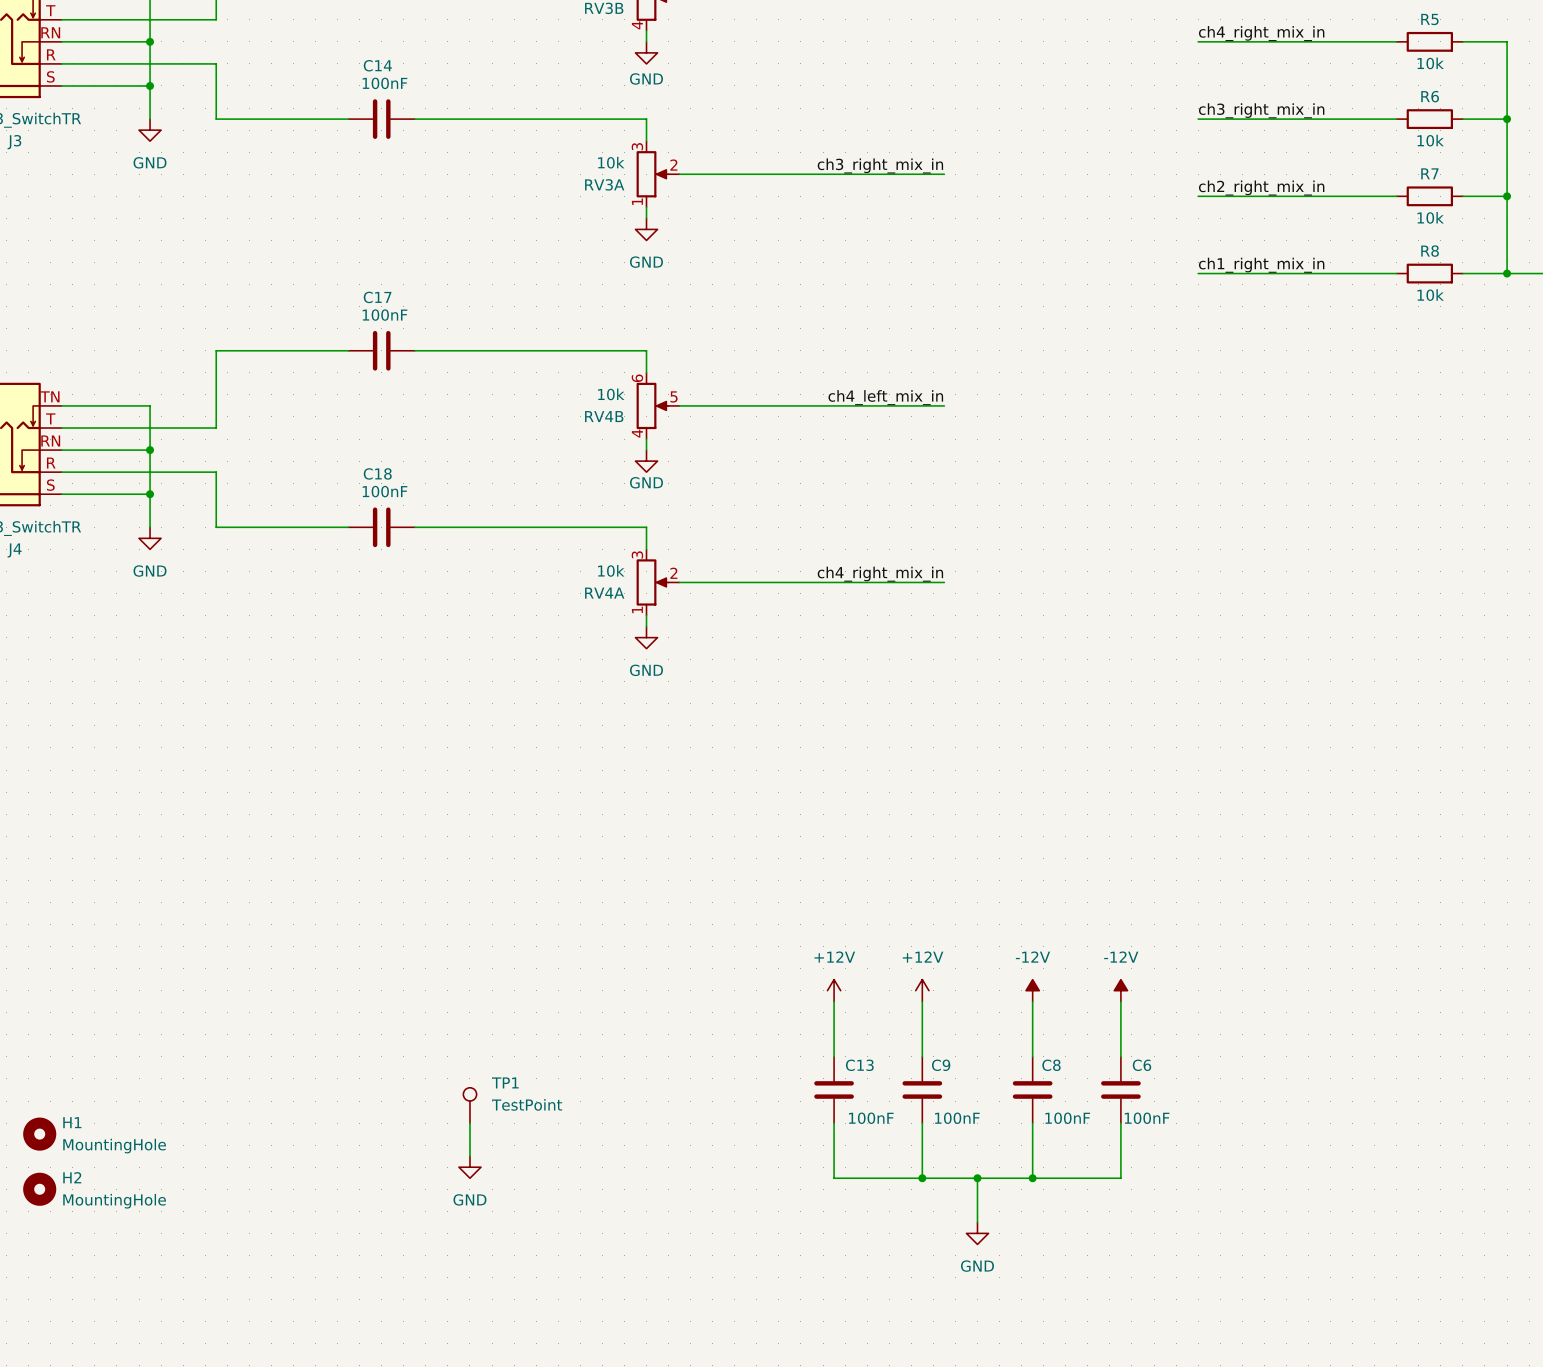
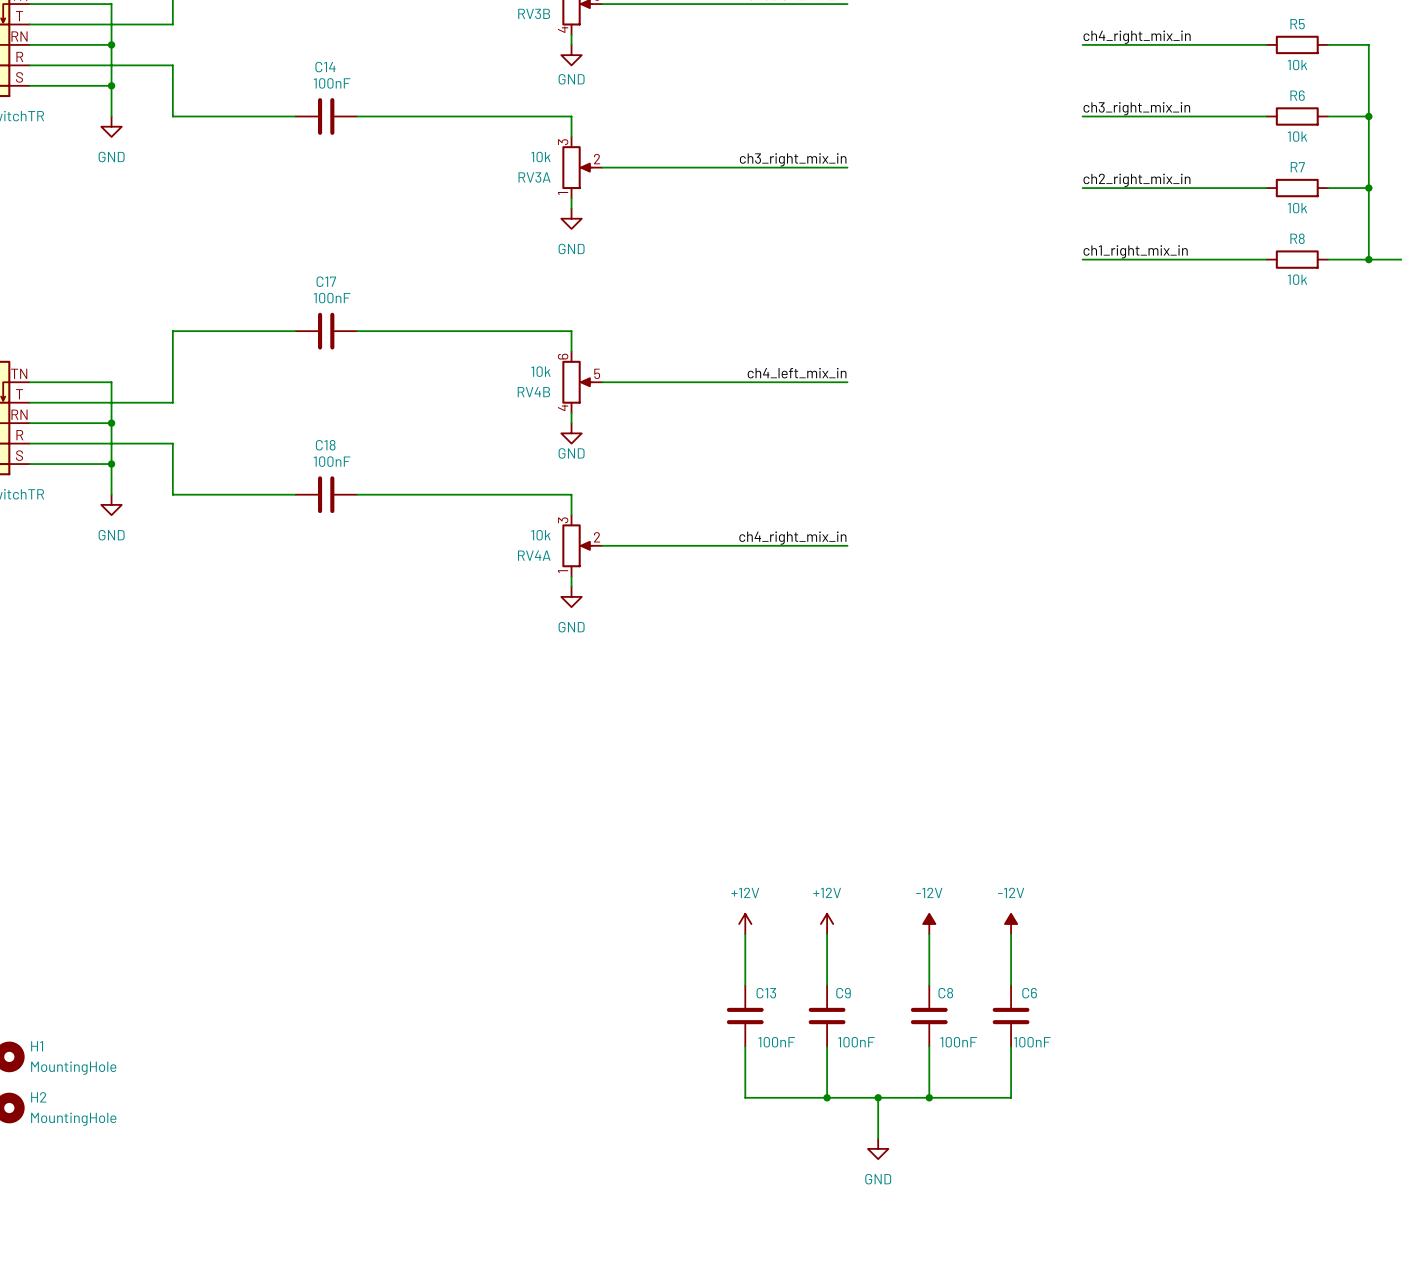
TP1: TestPoint (469, 1105) -> none
wire: (469, 1123) (469, 1156) -> none
power symbol: GND (469, 1167) -> none

